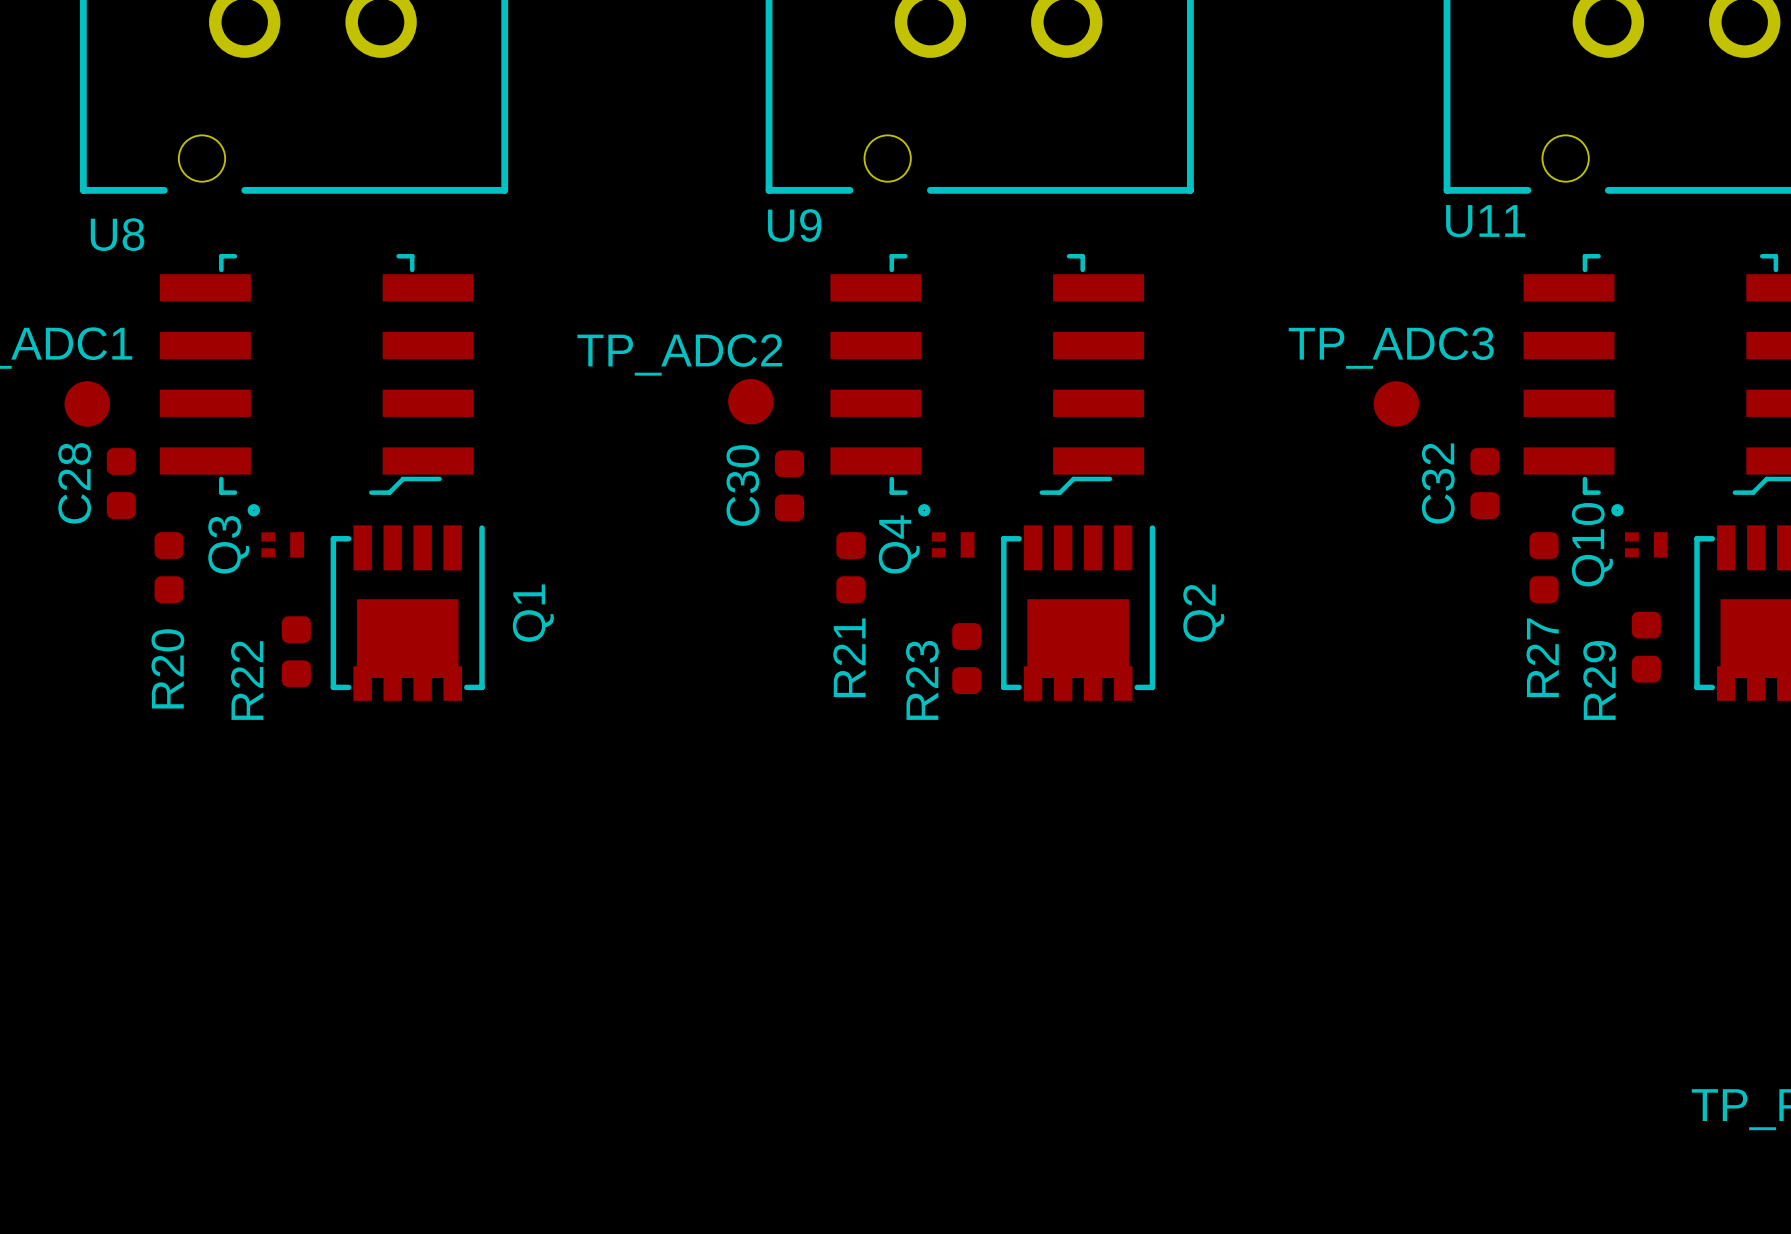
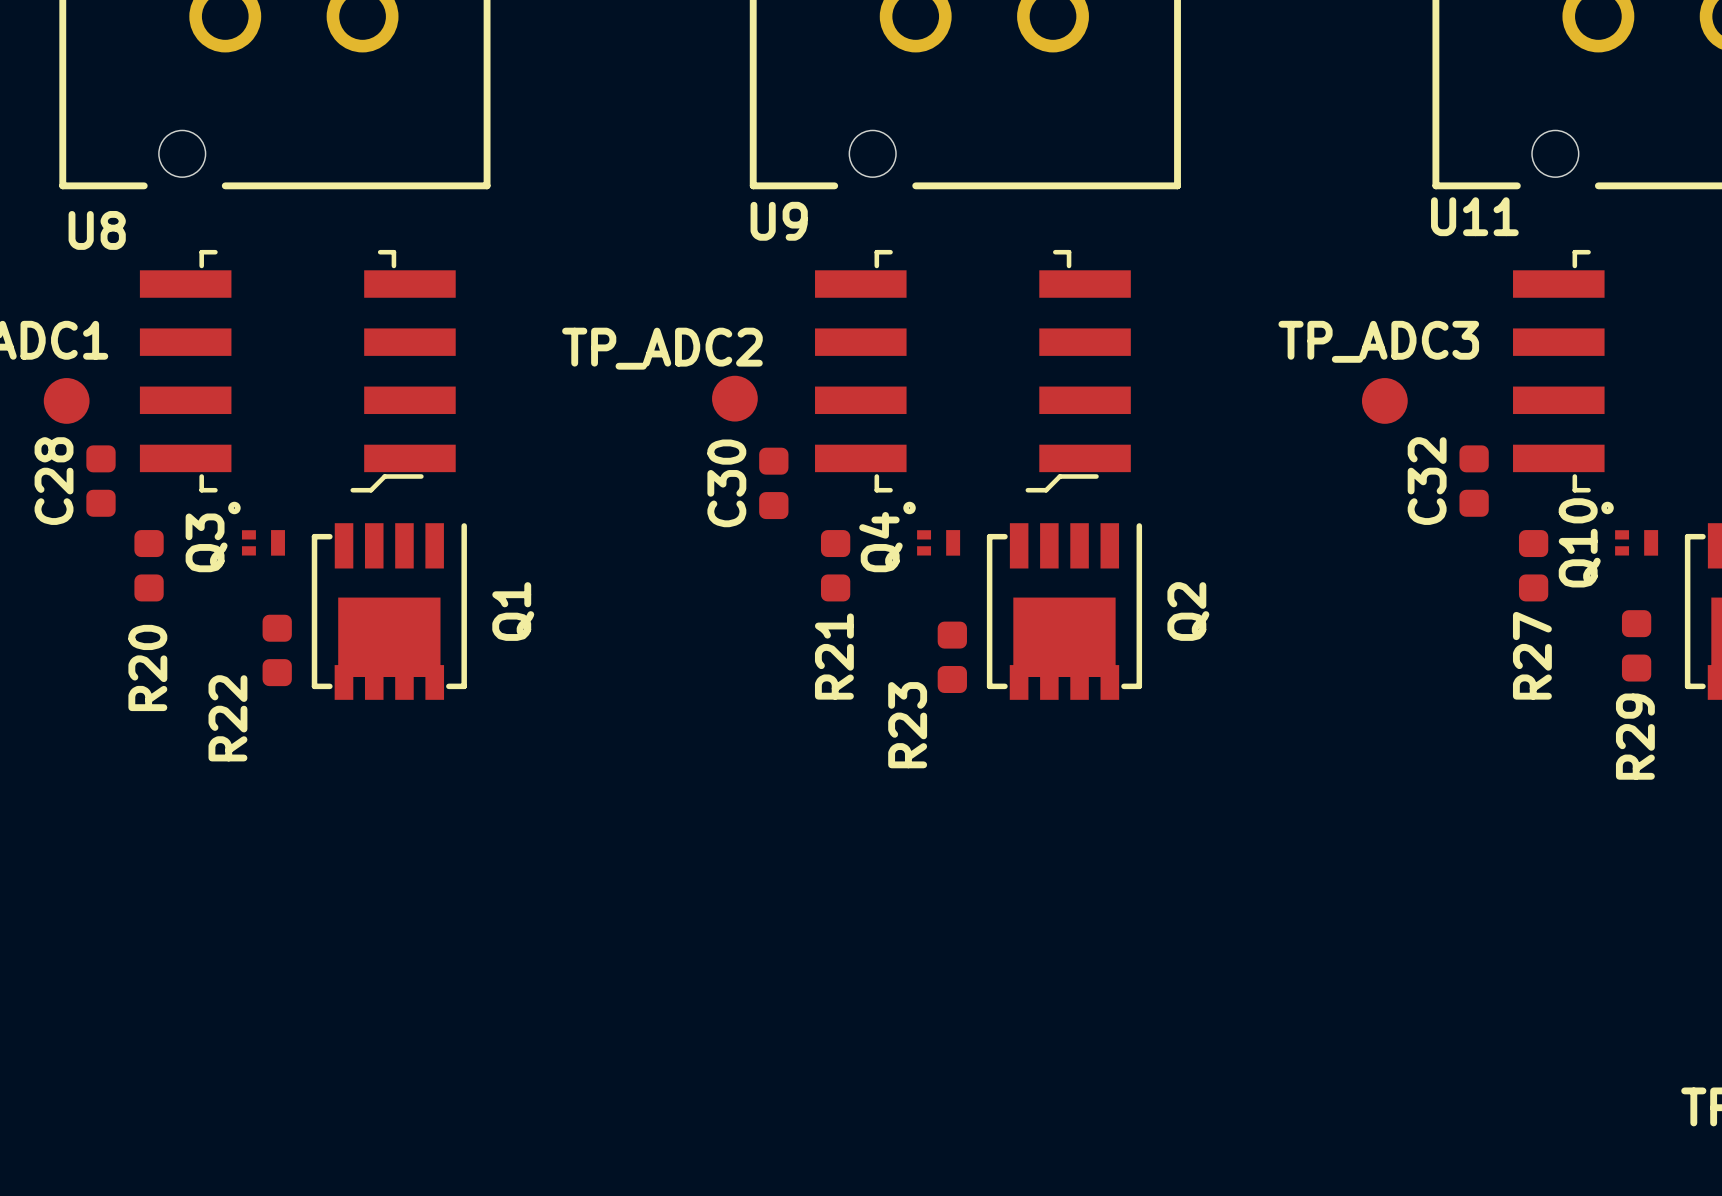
R22 name position: R22 (247, 680) -> R22 (227, 718)
R23 name position: R23 (922, 680) -> R23 (907, 725)
R29 name position: R29 (1599, 680) -> R29 (1635, 736)

